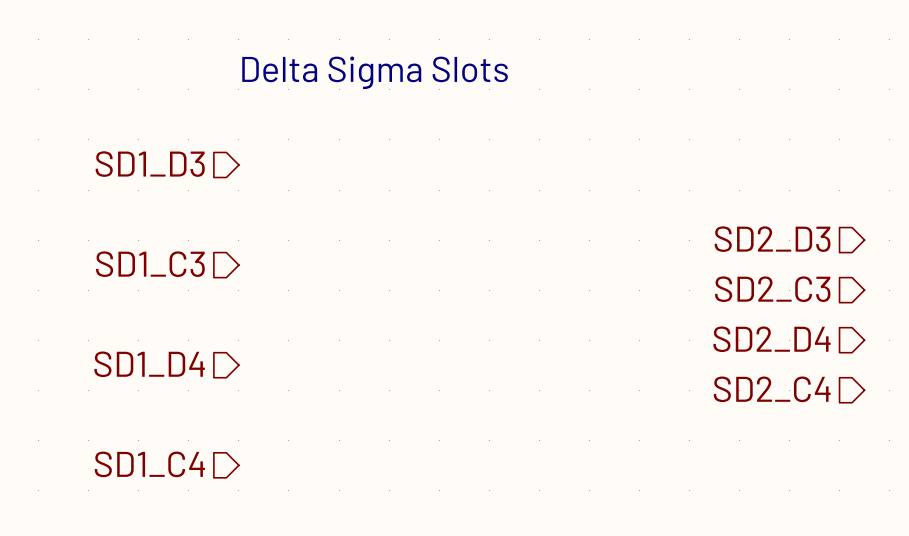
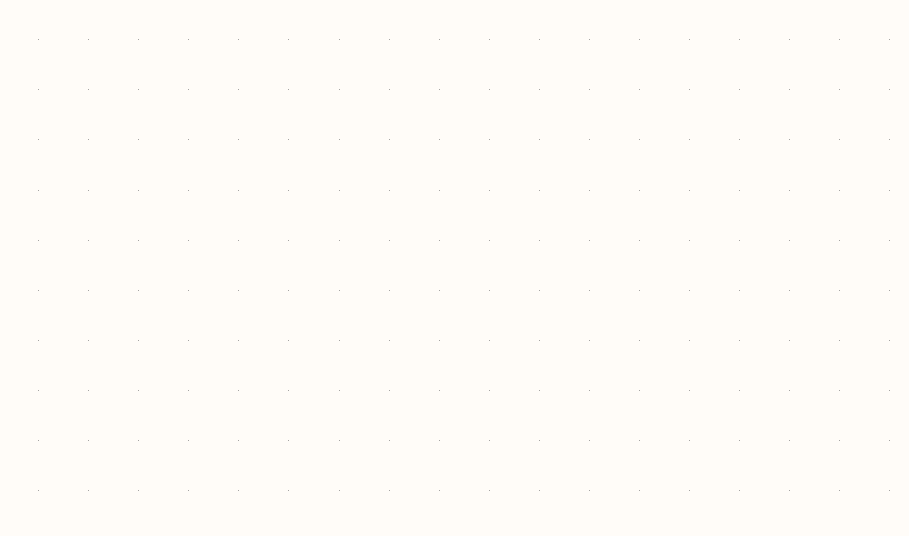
text: Delta Sigma Slots (375, 72) -> none
hierarchical label: SD1_D3 (150, 164) -> none
hierarchical label: SD2_D3 (772, 239) -> none
hierarchical label: SD1_C3 (150, 264) -> none
hierarchical label: SD2_C3 (772, 289) -> none
hierarchical label: SD2_D4 (772, 339) -> none
hierarchical label: SD1_D4 (149, 364) -> none
hierarchical label: SD2_C4 (772, 389) -> none
hierarchical label: SD1_C4 (149, 464) -> none

